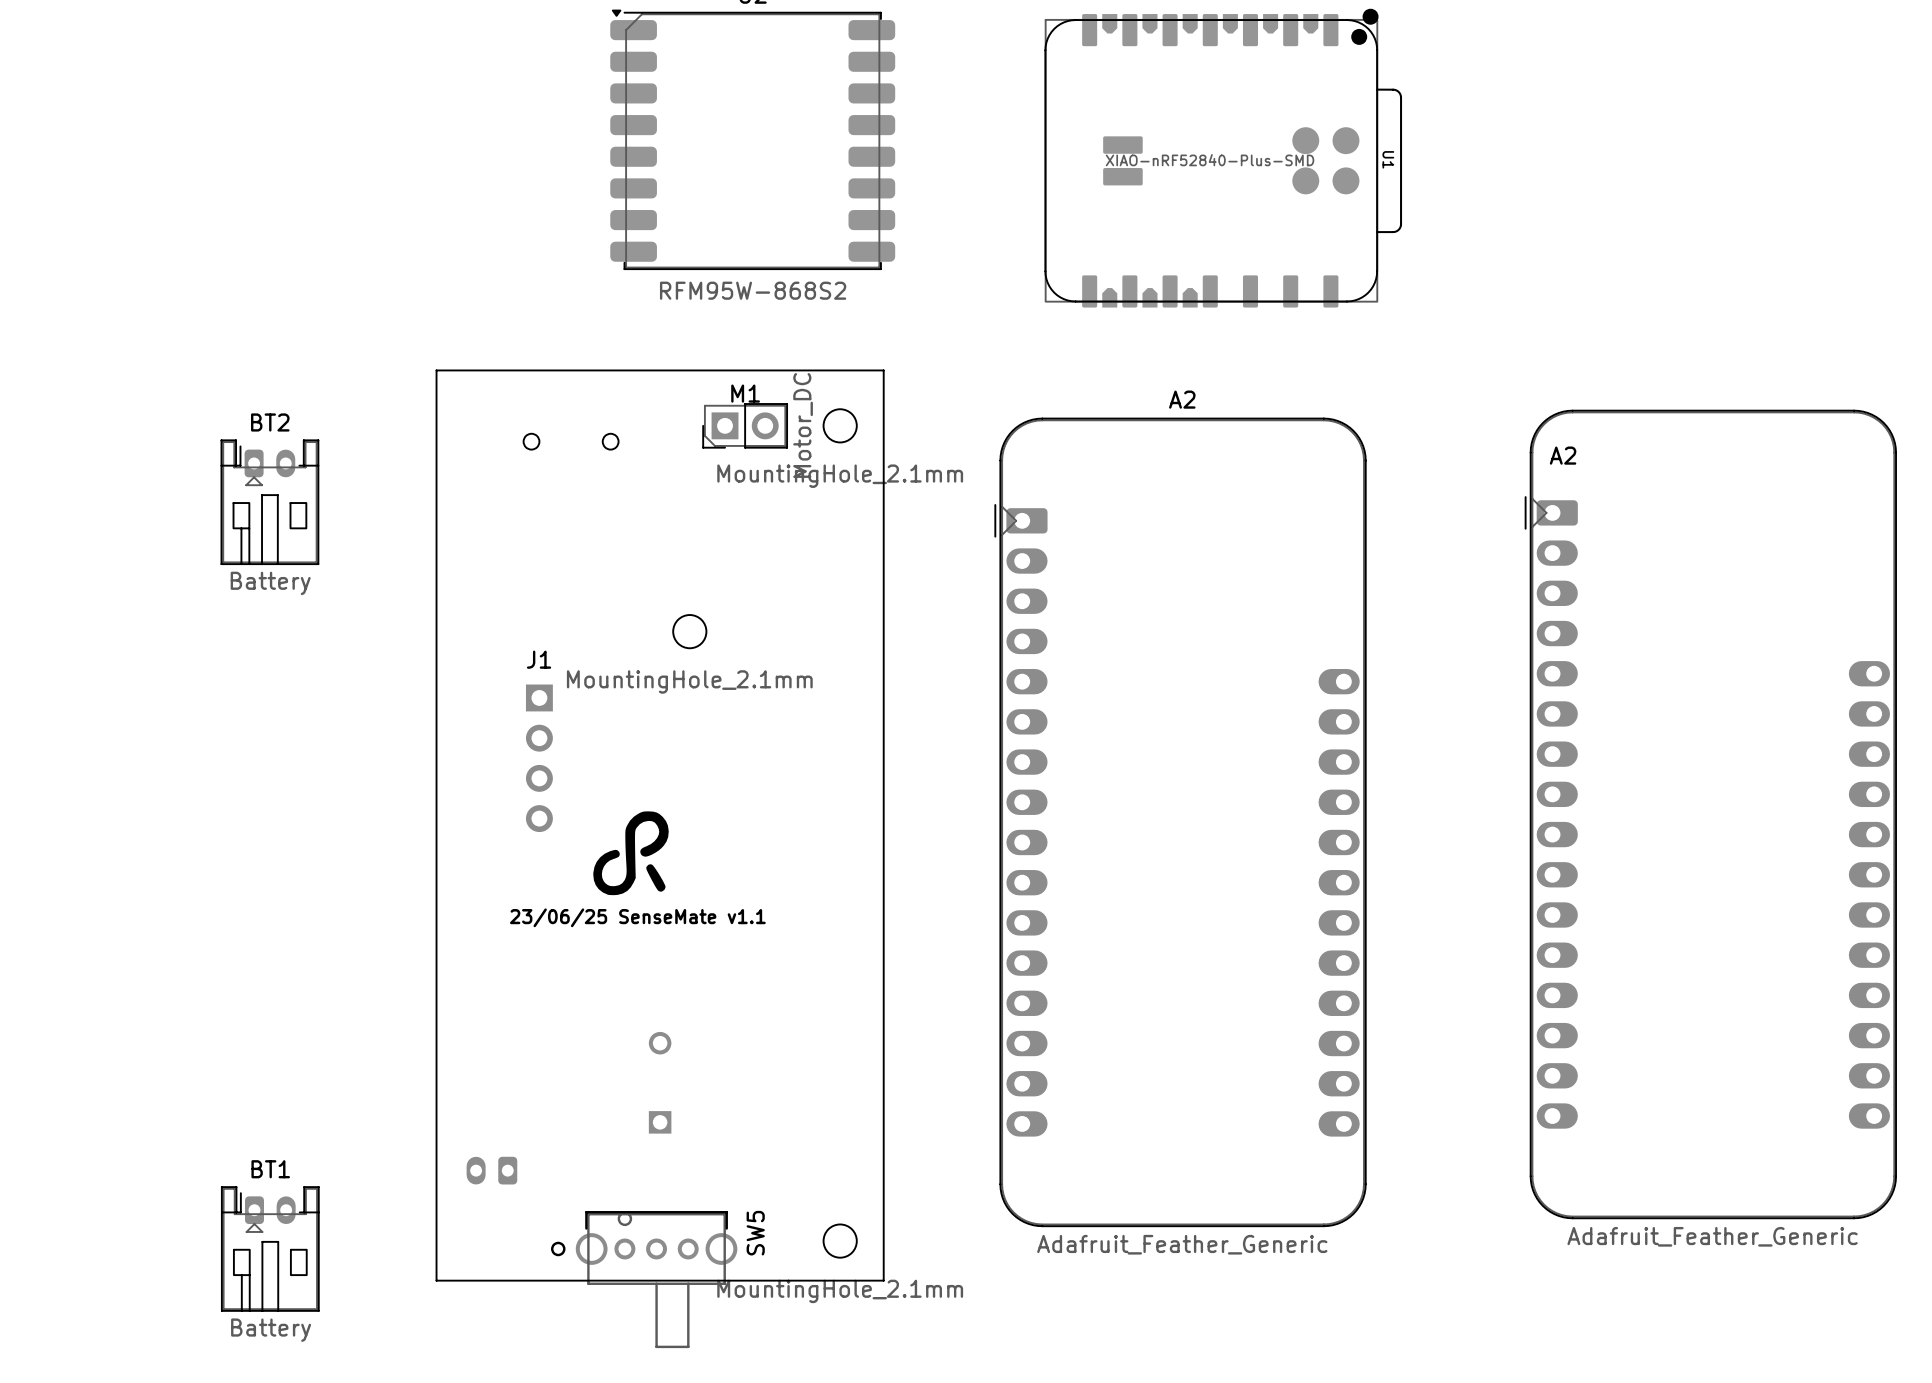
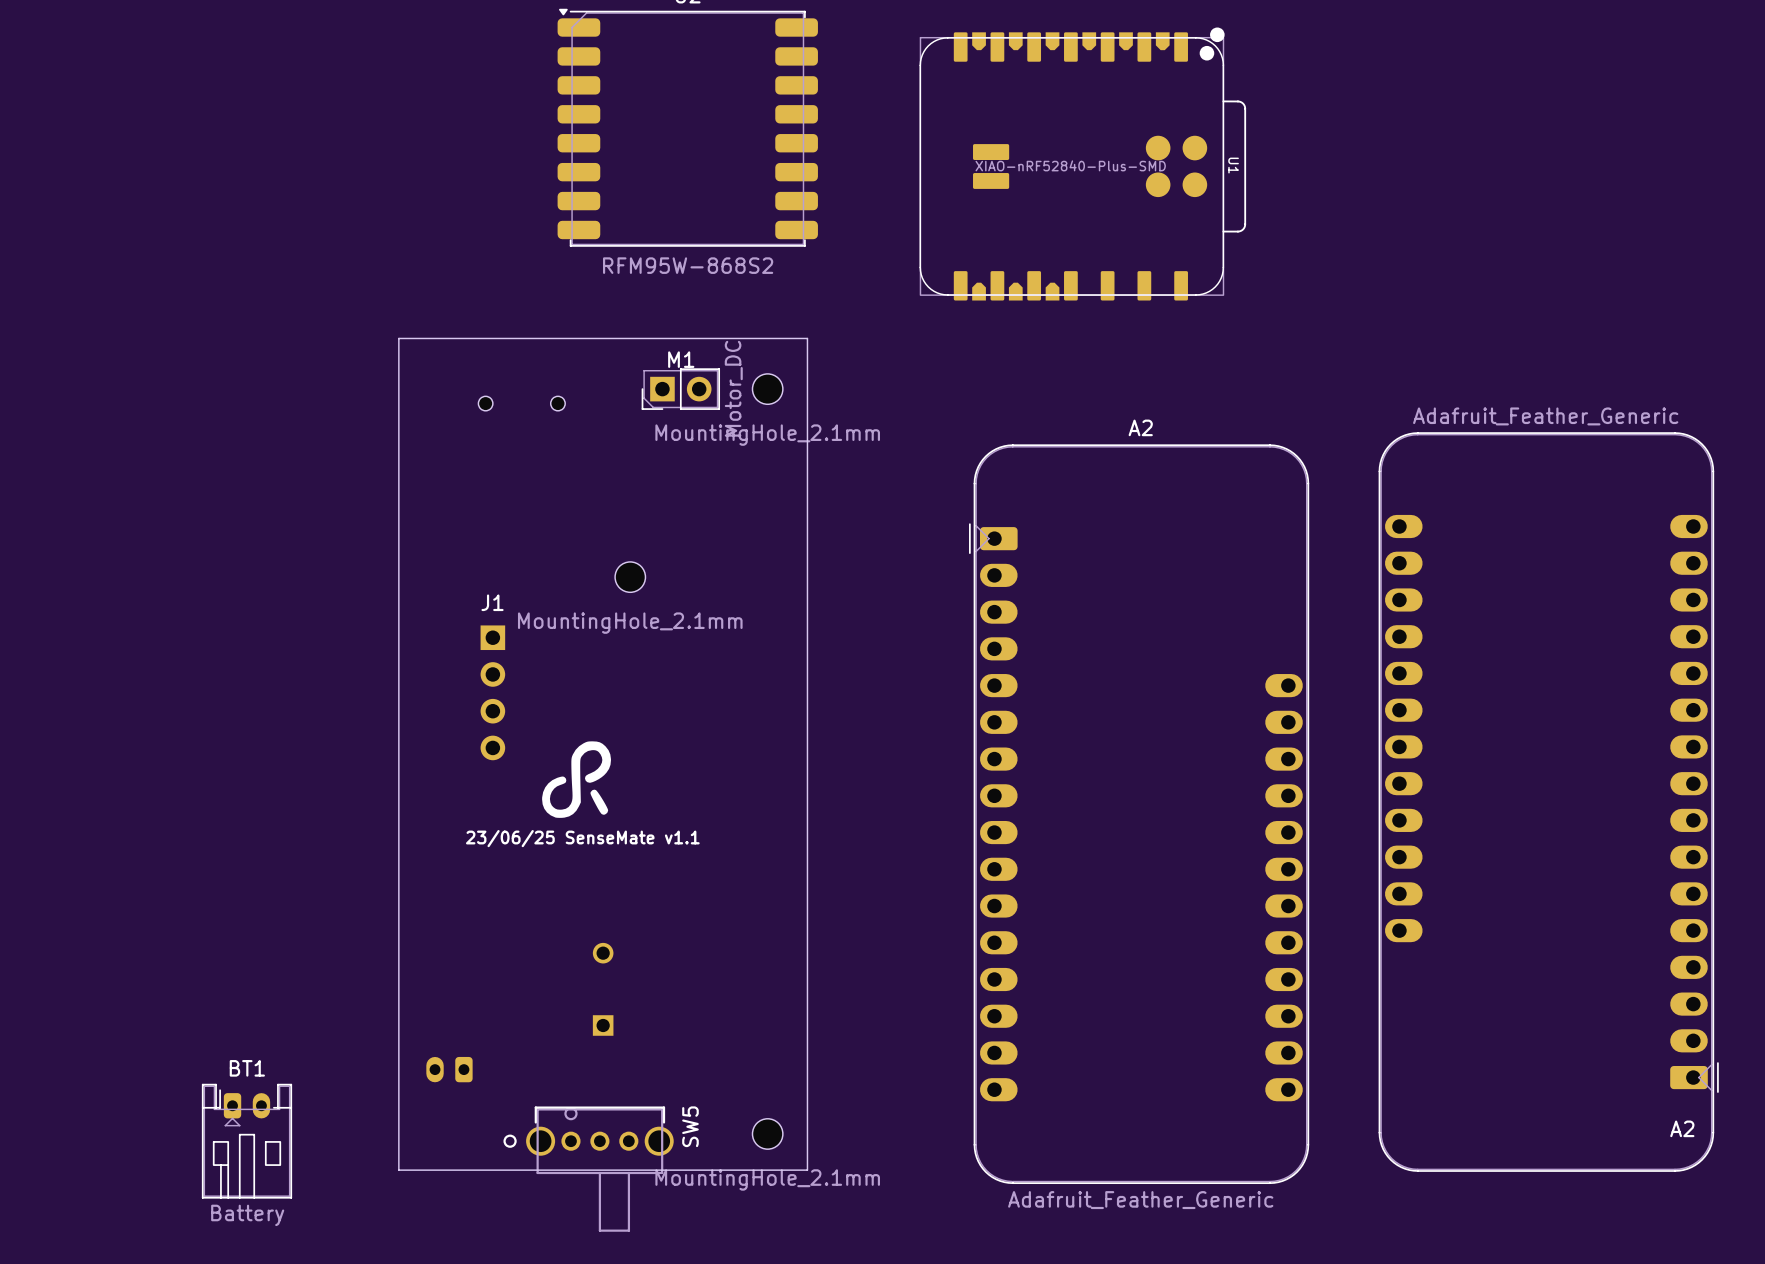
U1 position: (1223, 158) -> (1082, 164)
BT2: Battery (269, 502) -> none
A2 rotation: 0° (1710, 814) -> 180° (1548, 802)
A2 position: (1180, 822) -> (1139, 814)

